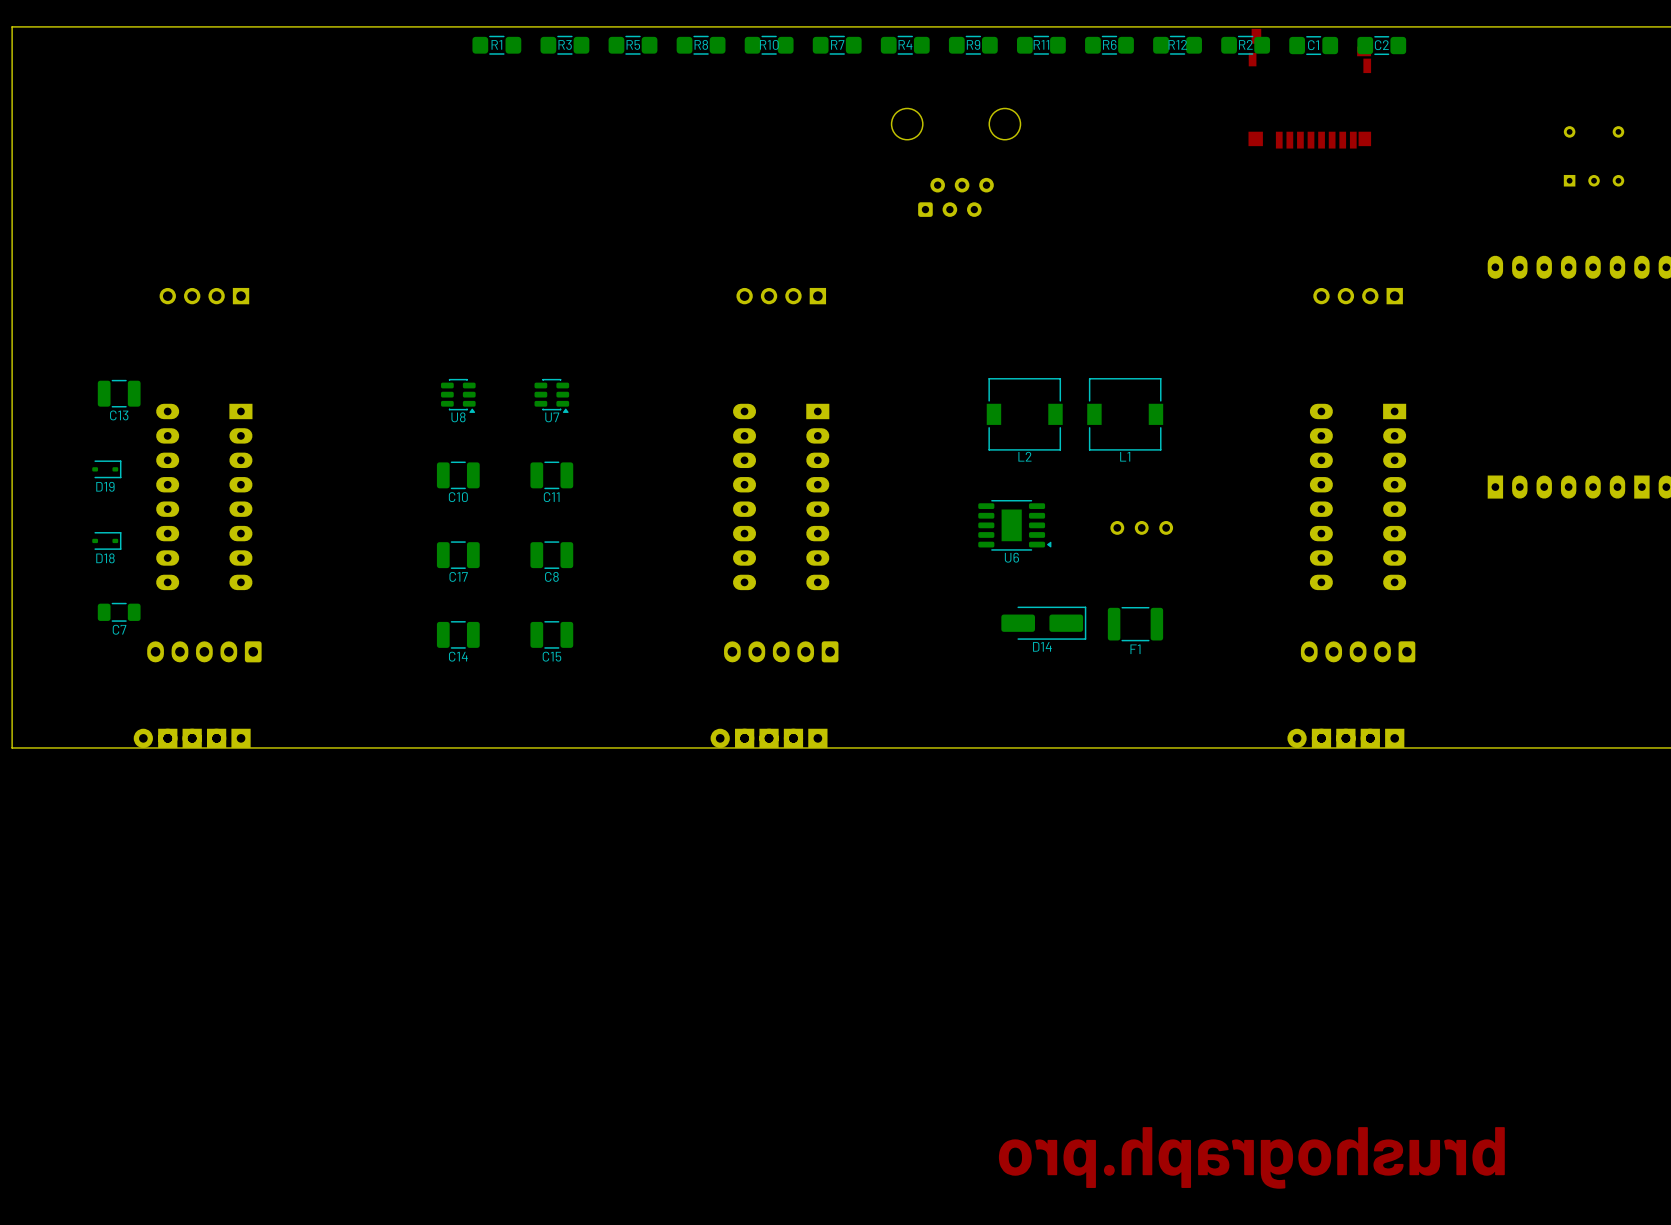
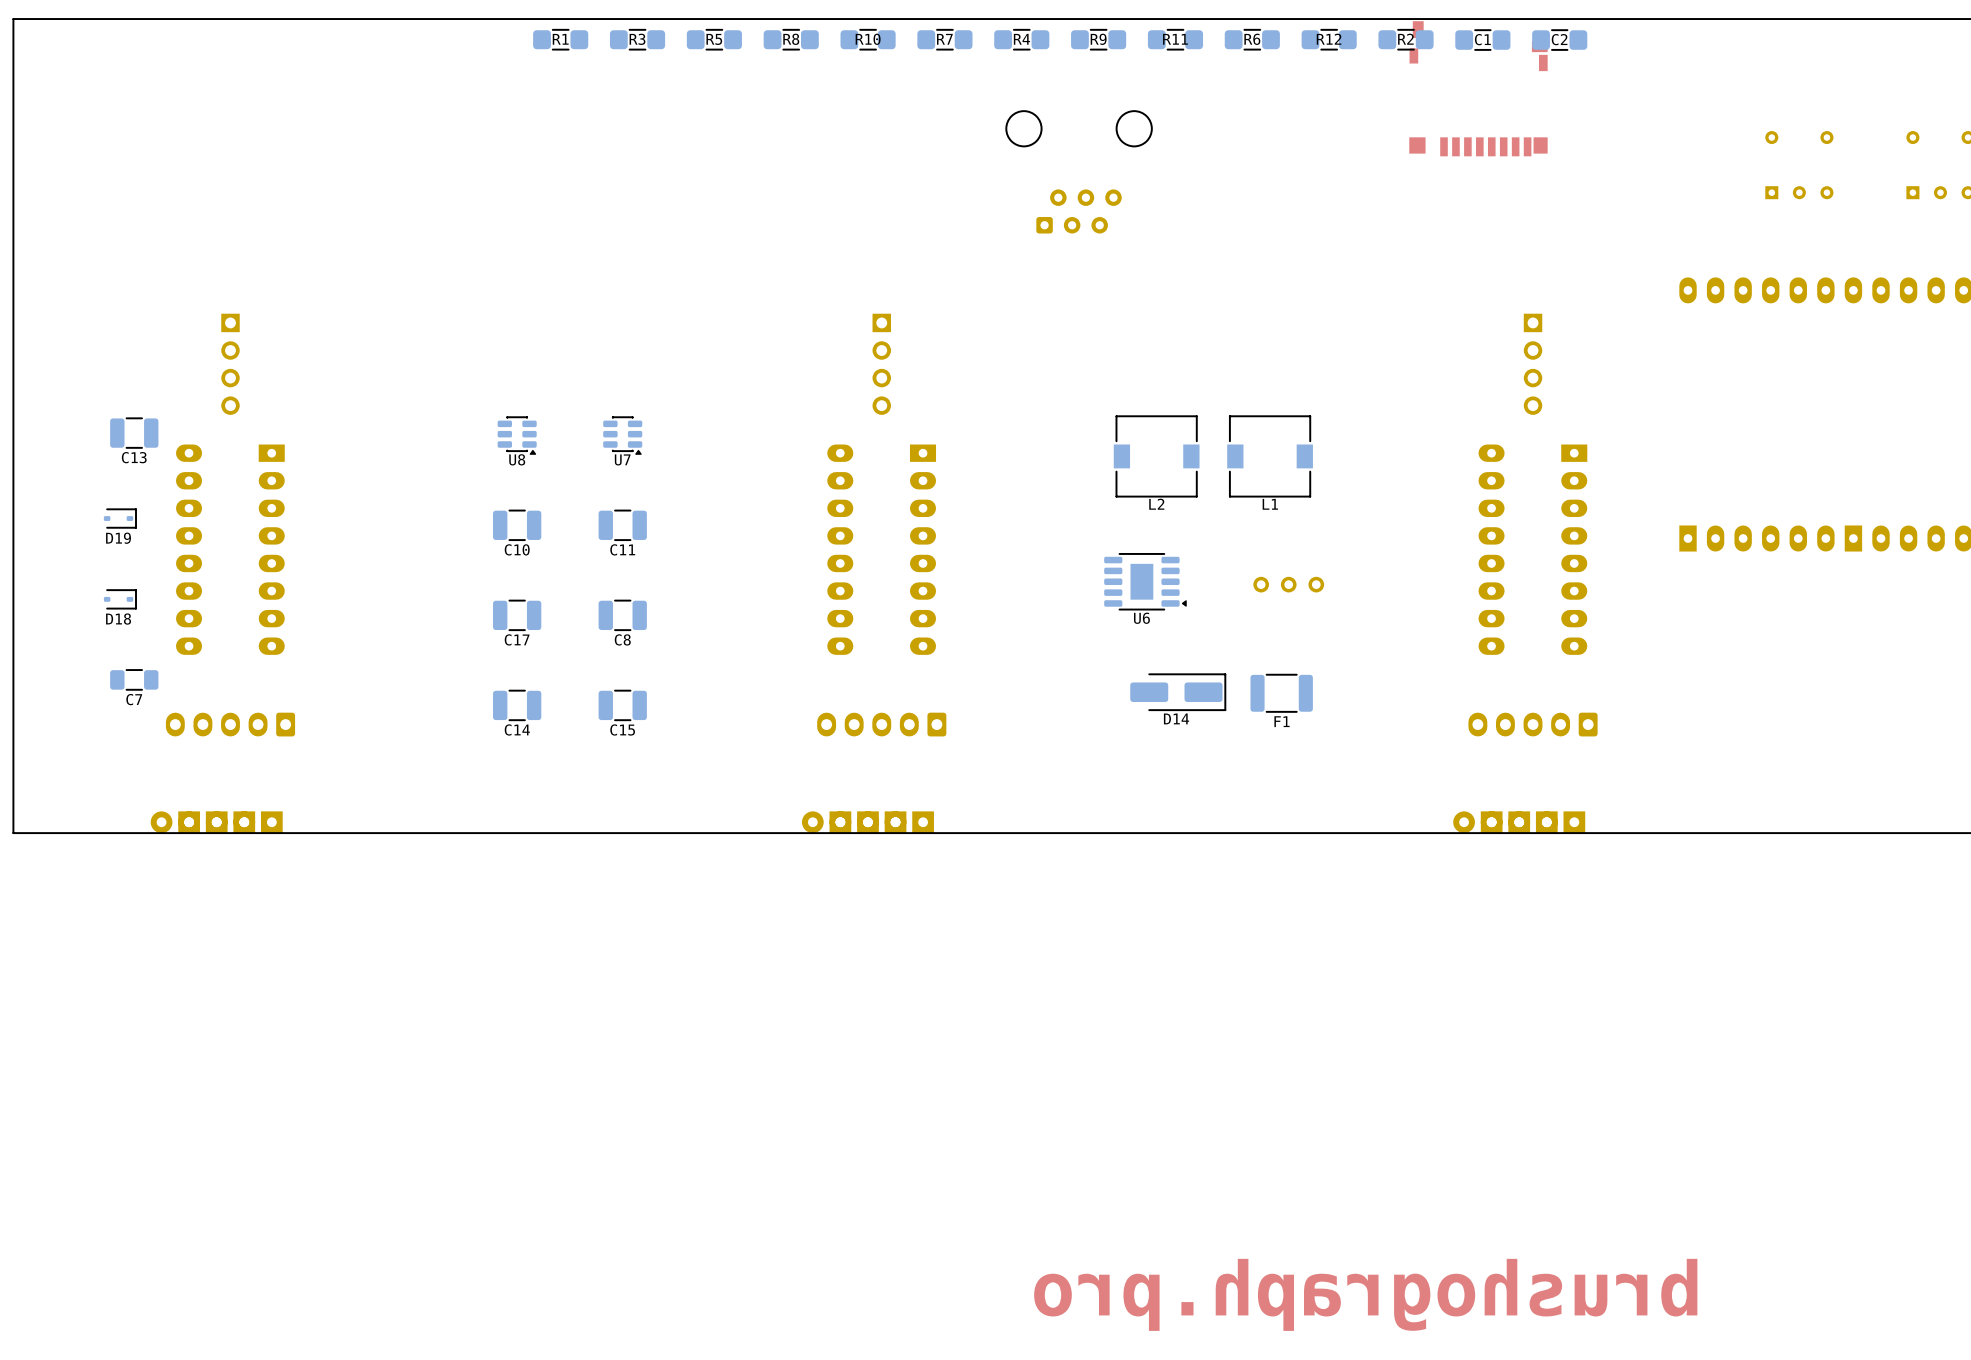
part rotation: 0° (204, 296) -> 90° counterclockwise (230, 364)
part rotation: 0° (781, 296) -> 90° counterclockwise (881, 364)
part rotation: 0° (1358, 296) -> 90° counterclockwise (1533, 364)

